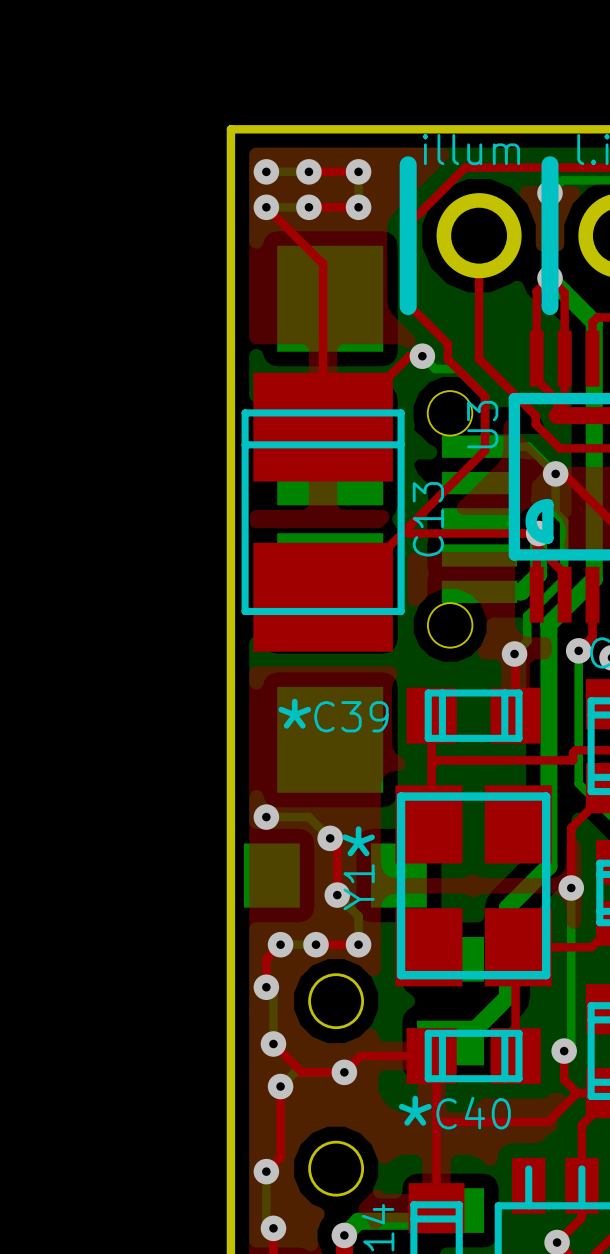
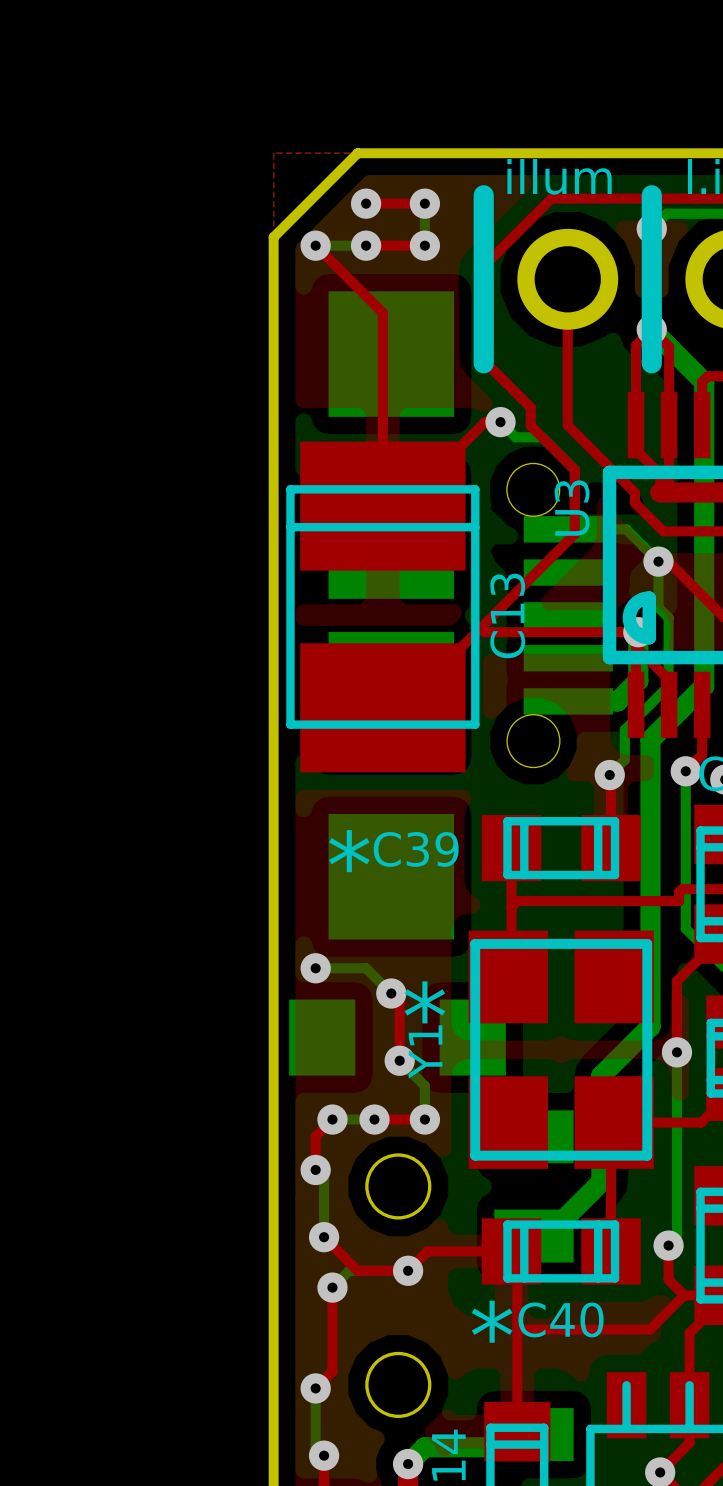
board edge: (301, 129) (230, 129) (230, 200) -> (357, 153) (273, 237)
via: (266, 171) -> none

